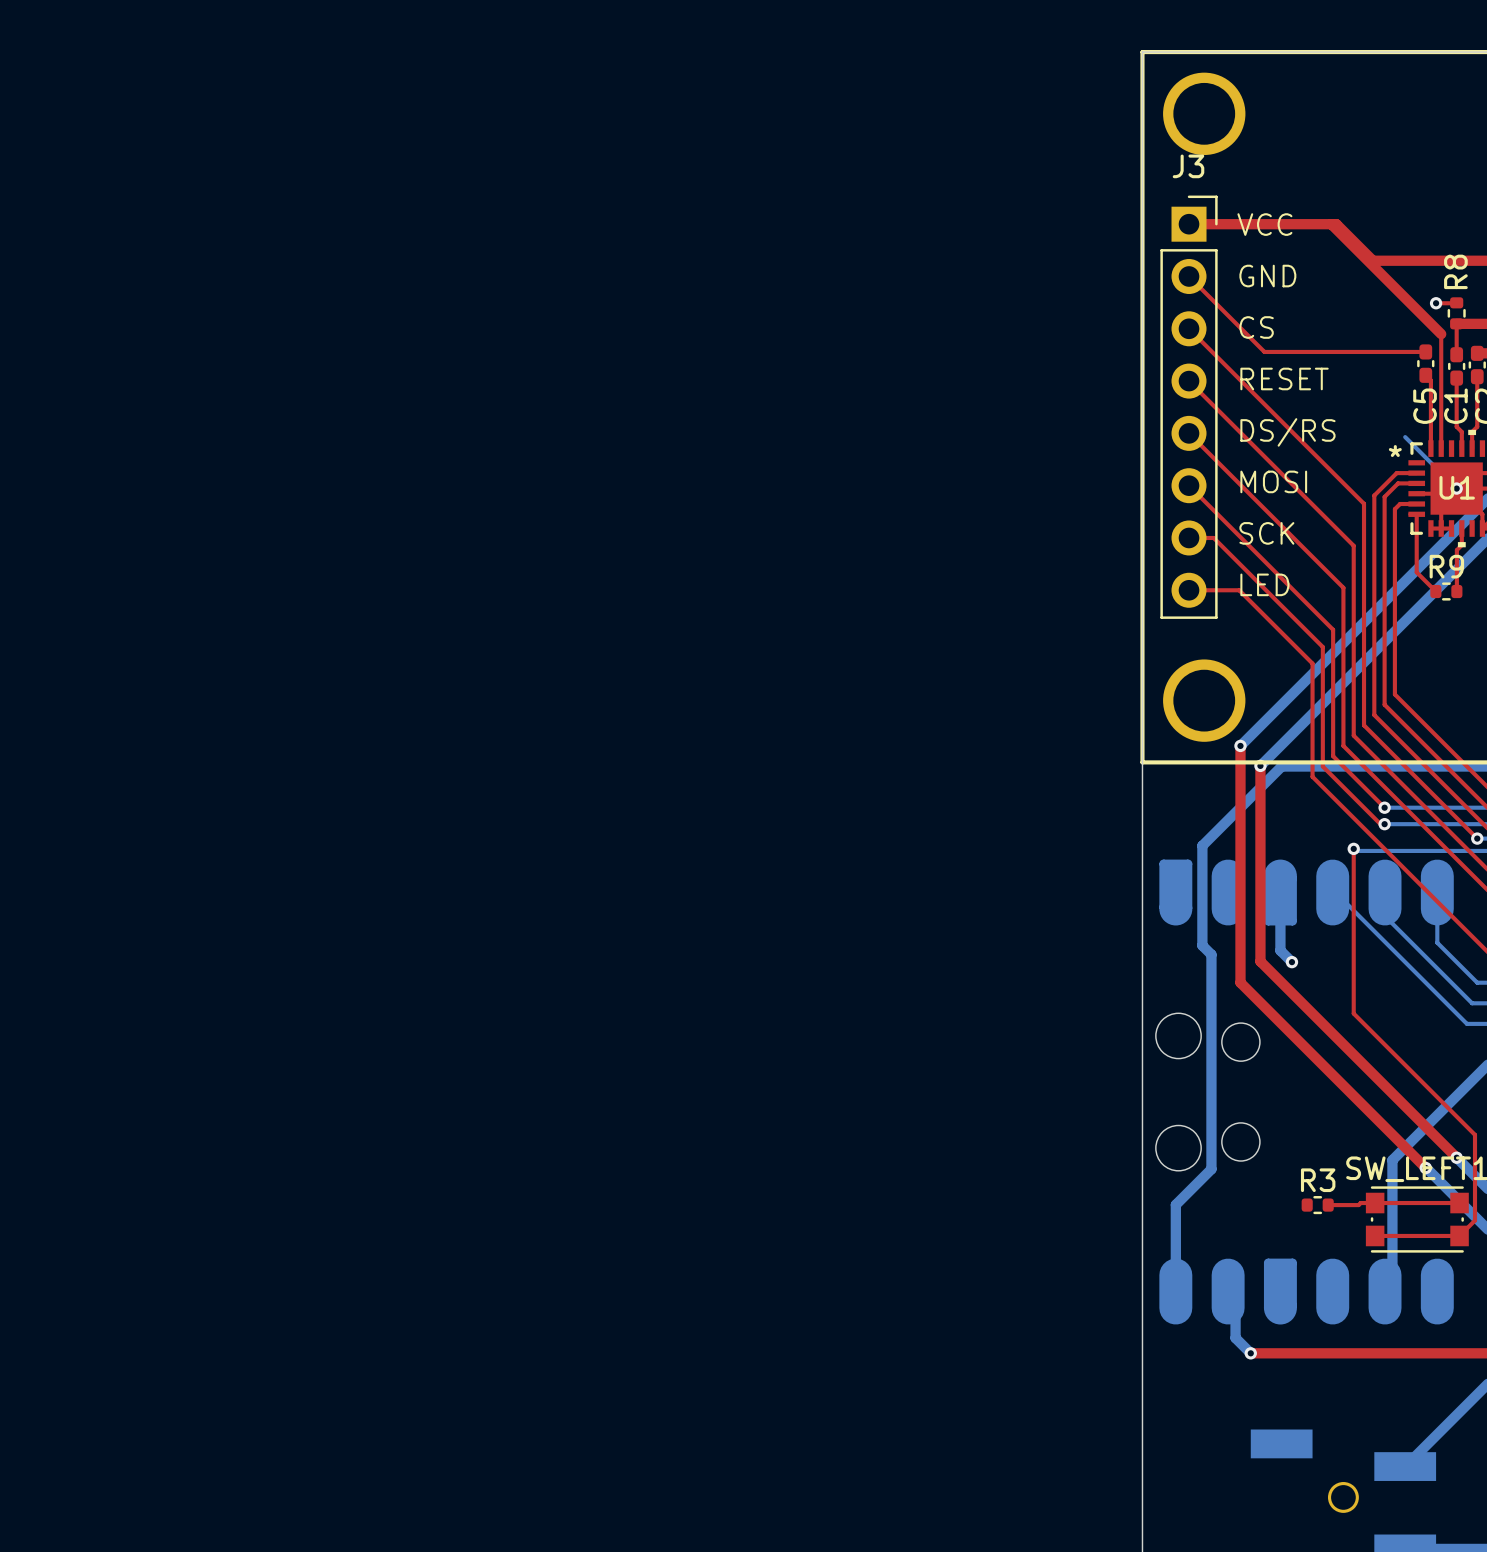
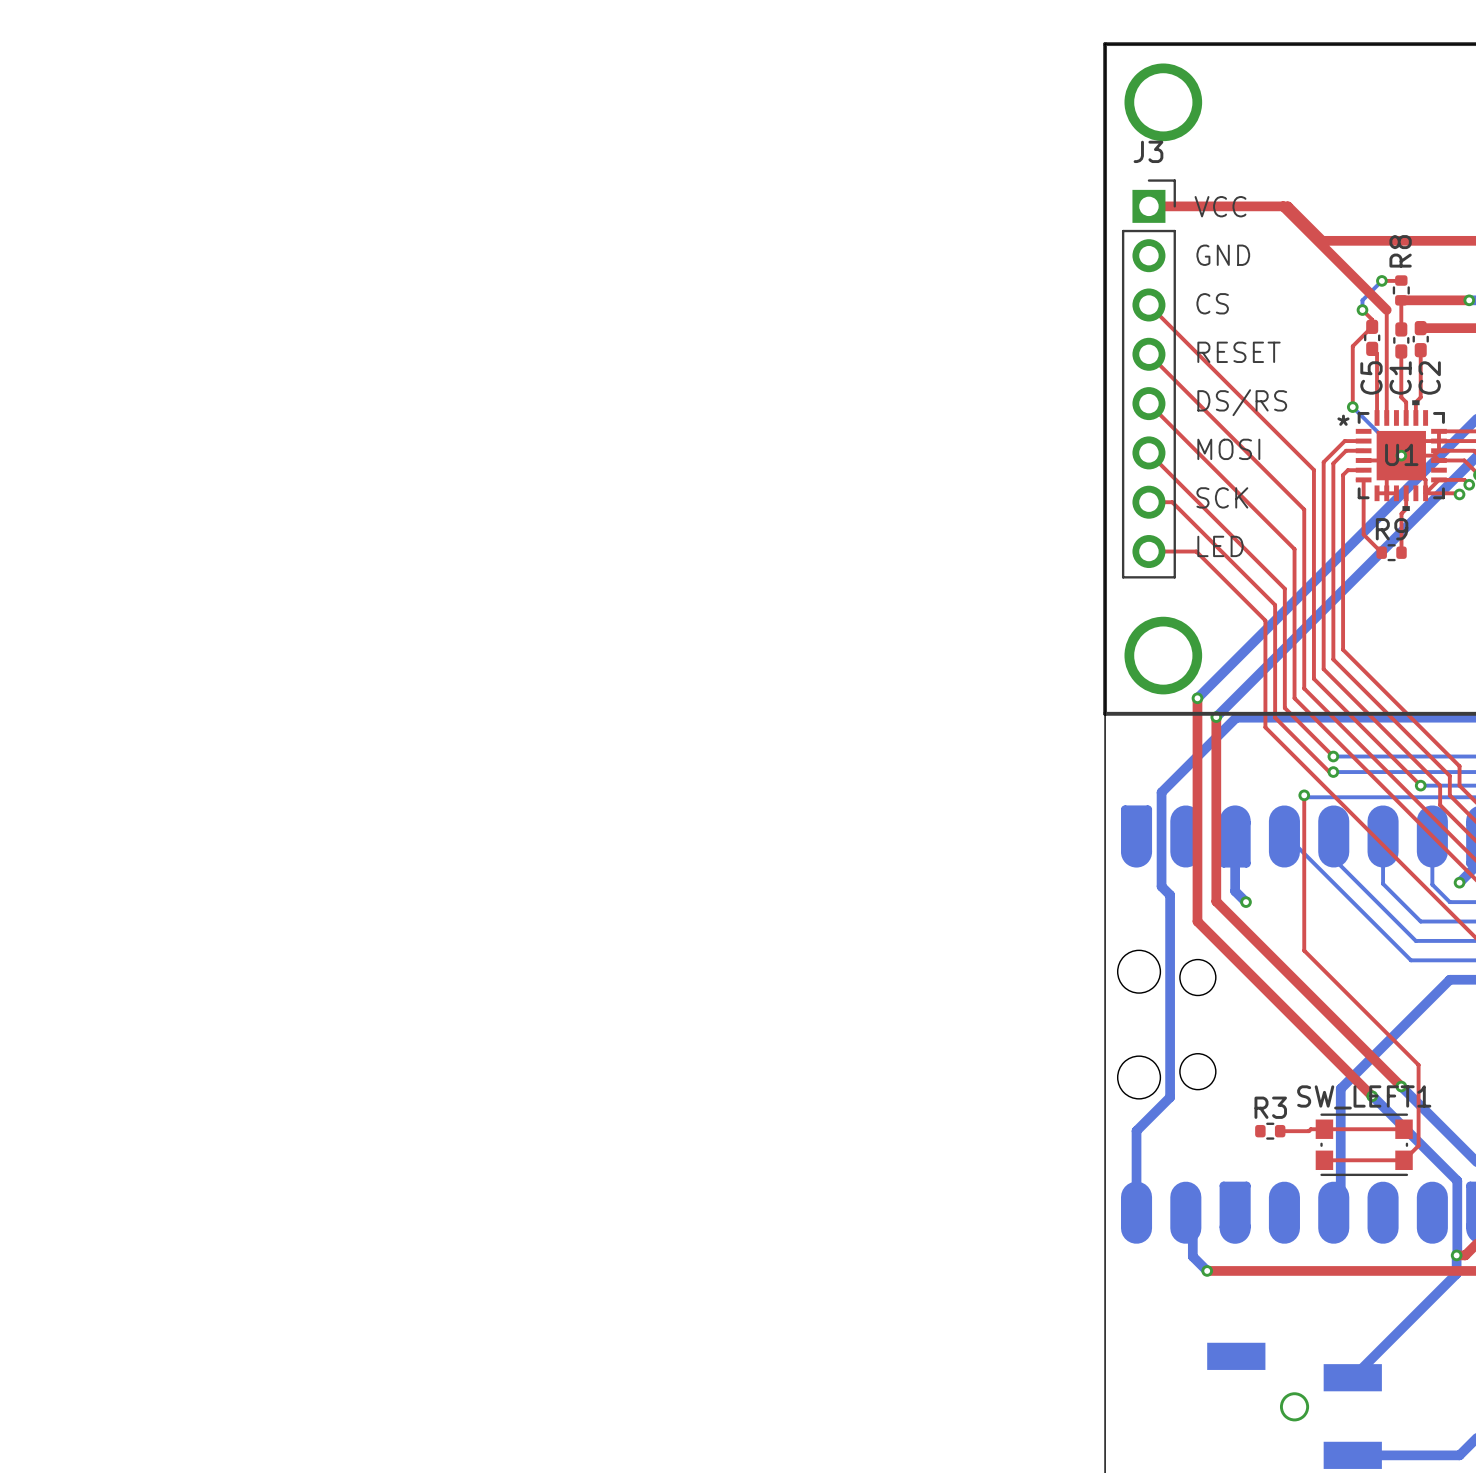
top track: (1189, 276) (1264, 351) (1425, 351) -> none
bottom track: none -> (1381, 280) (1362, 300) (1362, 310)
top track: none -> (1362, 310) (1372, 319) (1372, 326) (1352, 346) (1352, 407)
via: none -> (1362, 310)
via: none -> (1352, 407)

